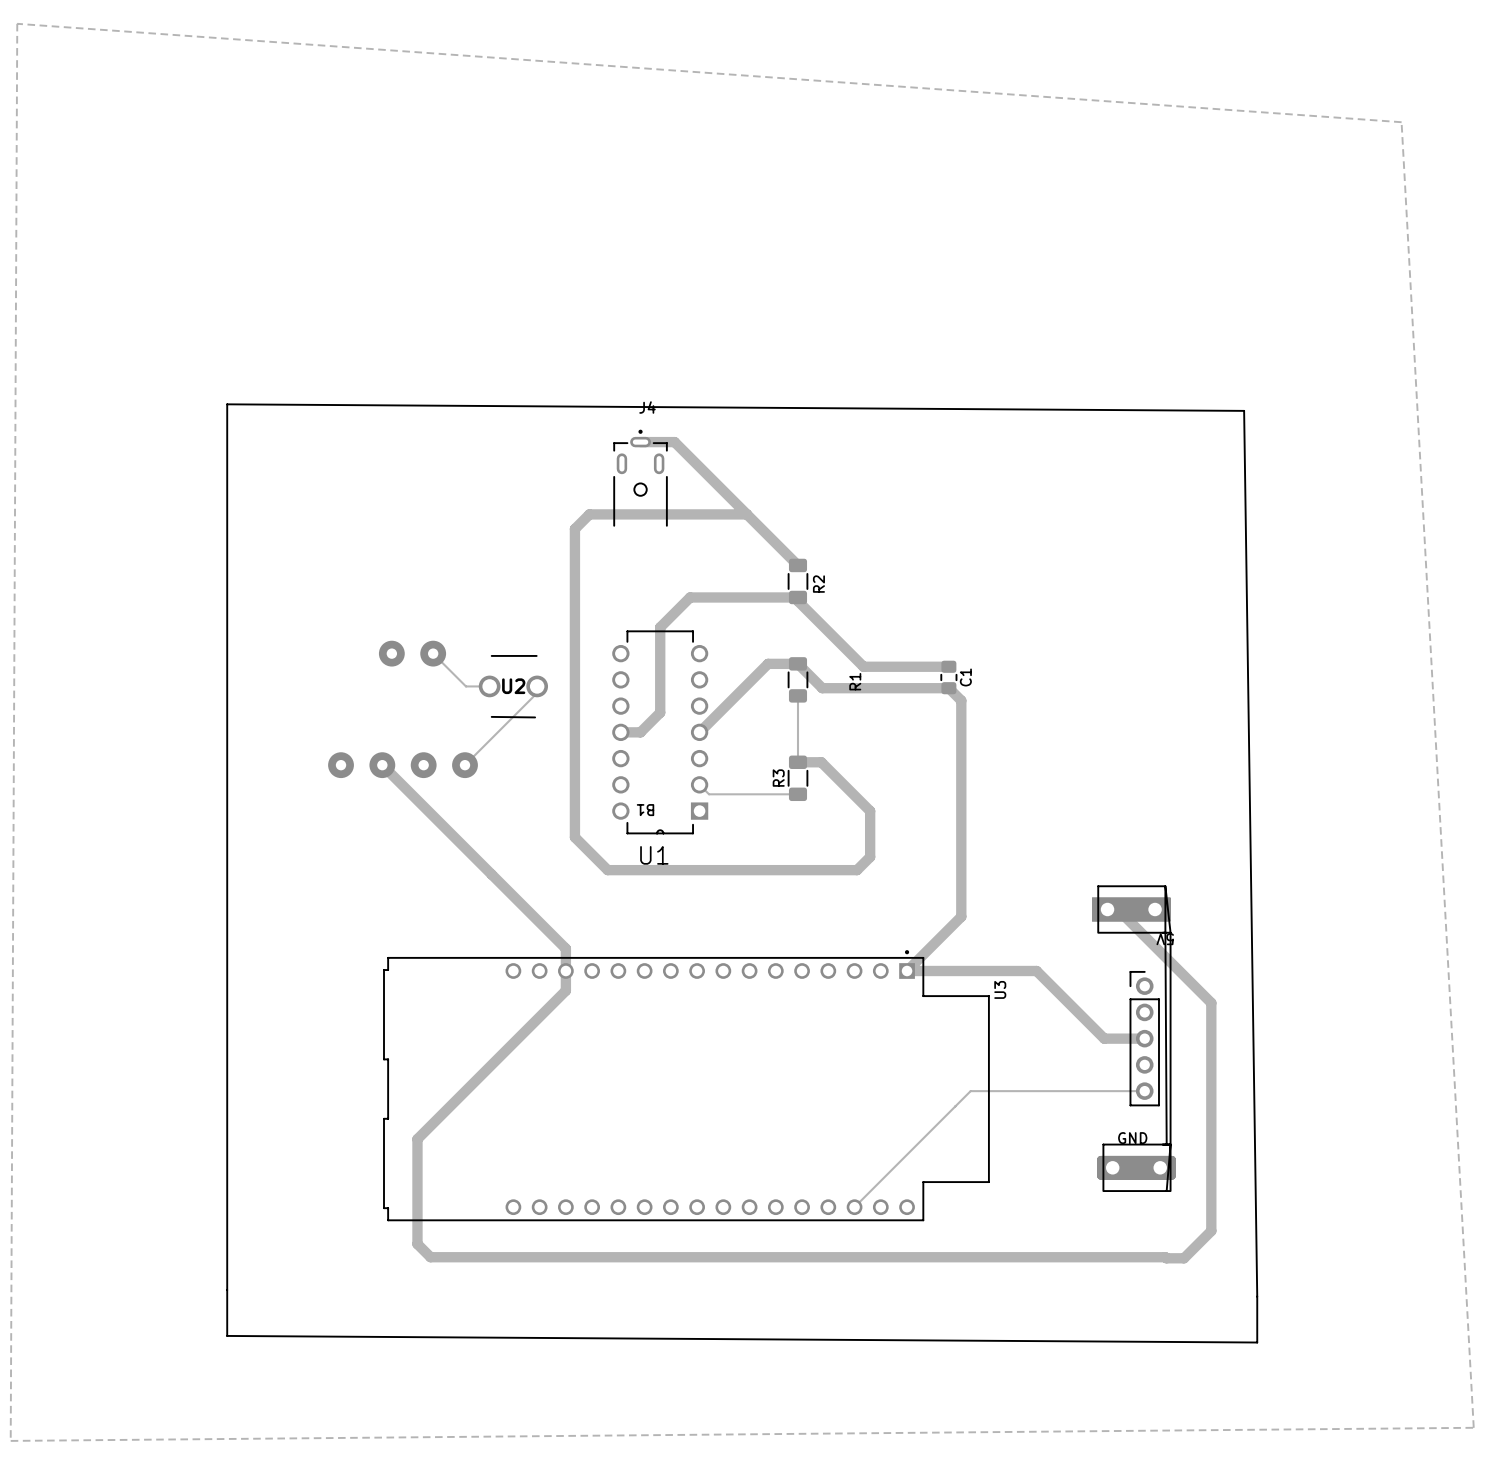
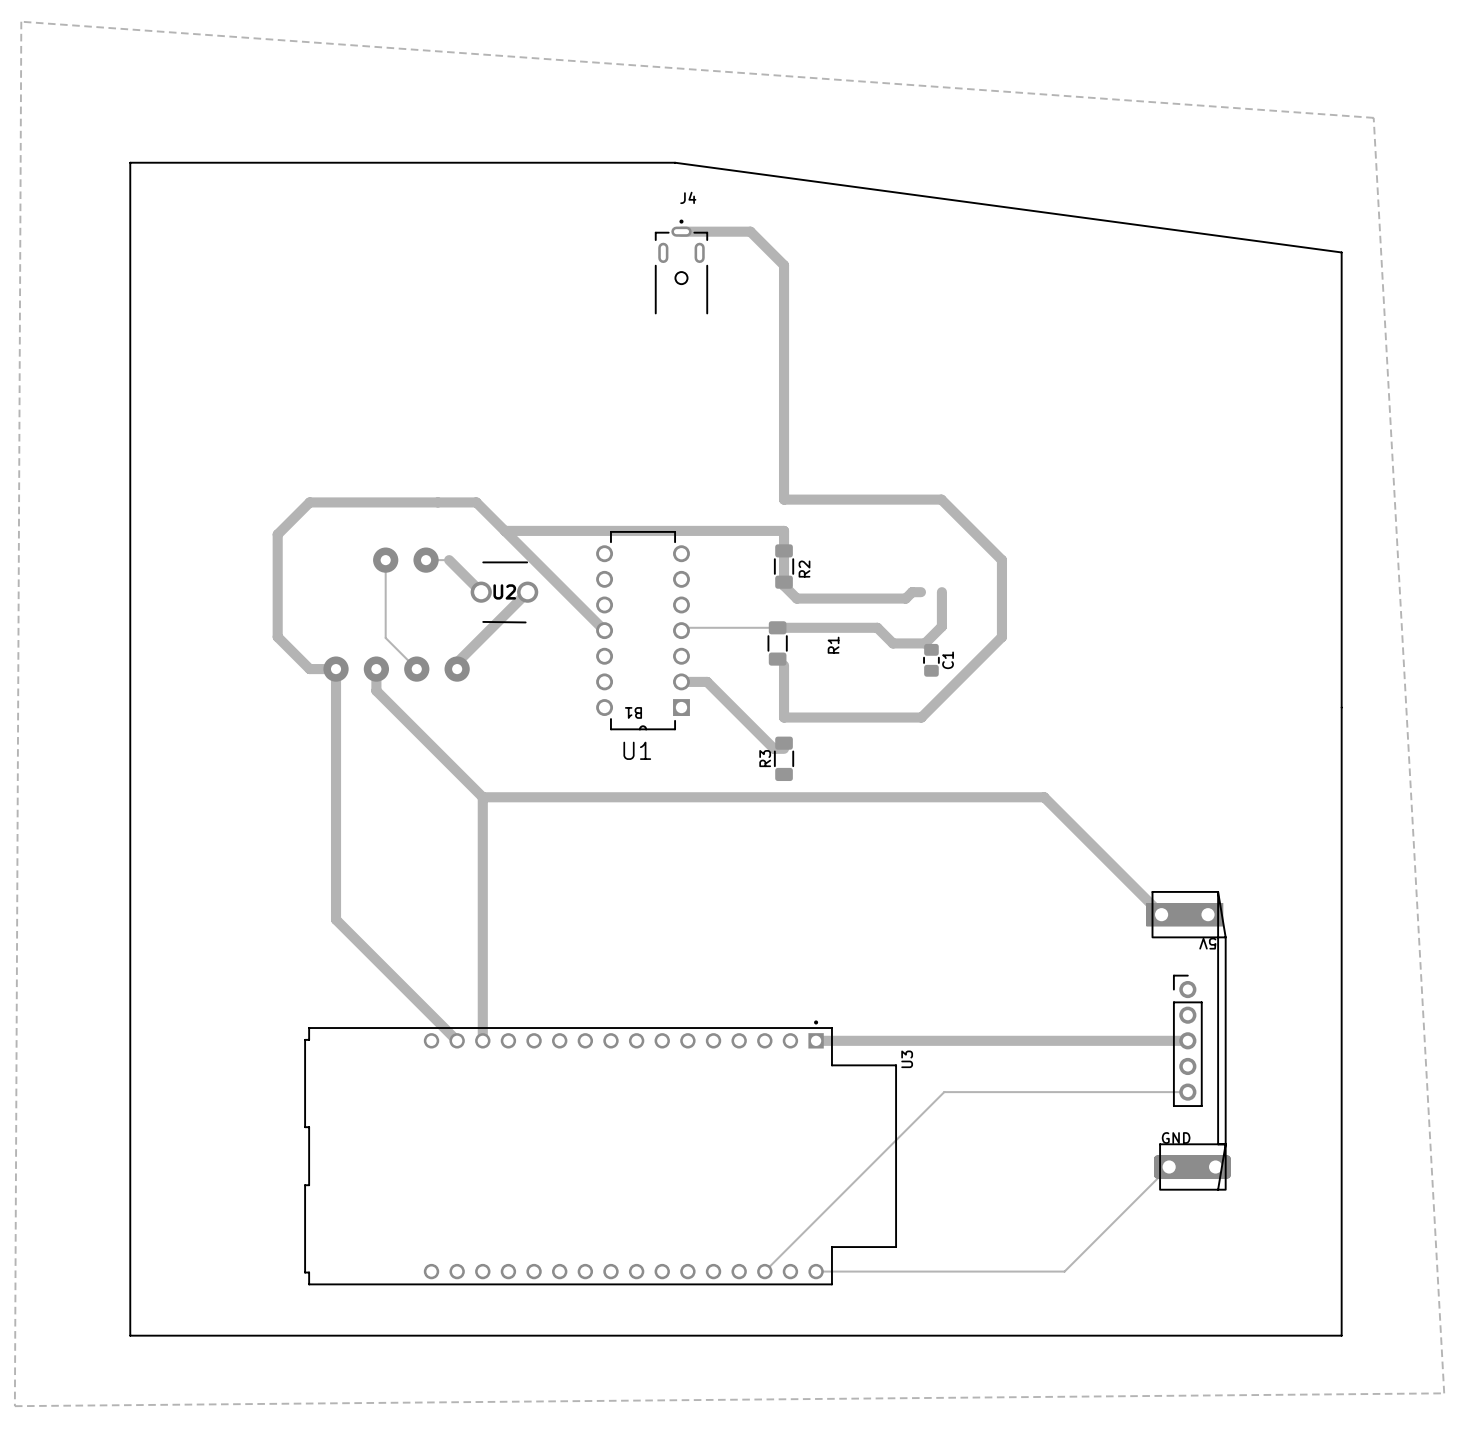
board edge: (227, 404) (1244, 410) (1257, 1342) (227, 1335) (227, 404) -> (130, 162) (130, 1335) (1341, 1335) (1341, 252) (675, 162) (130, 162)
track: (640, 442) (674, 442) (797, 565) -> none
J4 position: (640, 478) -> (681, 266)
track: (746, 514) (589, 514) (574, 528) (574, 837) (607, 870) (857, 870) (870, 857) (870, 811) (821, 762) (797, 762) (797, 736) -> (681, 231) (750, 231) (784, 265) (784, 499) (941, 499) (1001, 560) (1001, 637) (921, 717) (784, 717)
track: none -> (385, 560) (385, 637) (416, 669)
track: none -> (426, 560) (449, 560) (481, 592)
track: (797, 597) (690, 597) (660, 627) (660, 712) (640, 732) (620, 732) -> (784, 582) (784, 530) (505, 531)
track: none -> (527, 592) (457, 662) (457, 669)
track: none -> (941, 592) (941, 626) (925, 643) (892, 643) (877, 627) (684, 627) (681, 630)
track: (811, 614) (863, 666) (948, 666) -> (796, 598) (905, 598) (912, 592) (920, 592)
track: none -> (604, 630) (476, 502) (309, 502) (277, 534) (277, 637) (309, 669) (336, 669) (336, 919) (457, 1040)
part position: (412, 653) -> (405, 560)
track: (433, 653) (465, 686) (489, 686) -> none
track: none -> (777, 659) (784, 665) (784, 678)
R1 position: (797, 679) -> (777, 643)
track: none -> (376, 669) (376, 690) (482, 797)
U2 position: (513, 686) -> (504, 592)
track: (537, 686) (537, 693) (465, 765) -> none
track width: thin (797, 695) (797, 736) -> thick (784, 678) (784, 717)
track: none -> (681, 681) (707, 681) (774, 748) (784, 748)
U1 position: (660, 732) -> (643, 630)
track: (699, 732) (768, 663) (797, 663) (822, 688) (948, 688) (961, 700) (961, 916) (907, 971) (1036, 971) (1104, 1038) (1144, 1038) -> none
track: (382, 765) (565, 948) (565, 990) (417, 1139) (417, 1244) (430, 1257) (1184, 1258) (1211, 1230) (1211, 1002) (1117, 909) -> none
B1 position: (403, 765) -> (396, 669)
track: (699, 784) (709, 794) (797, 794) -> none
track: none -> (482, 797) (1044, 797) (1161, 914)
track: none -> (482, 797) (482, 1040)
part: (1133, 1038) -> none
track: none -> (816, 1040) (1187, 1040)
part: none -> (1188, 1040)
U3 position: (686, 1085) -> (600, 1152)
track: (1144, 1091) (970, 1091) (854, 1207) -> none
track: none -> (1187, 1092) (944, 1092) (764, 1271)
track: none -> (1169, 1167) (1064, 1271) (816, 1271)

